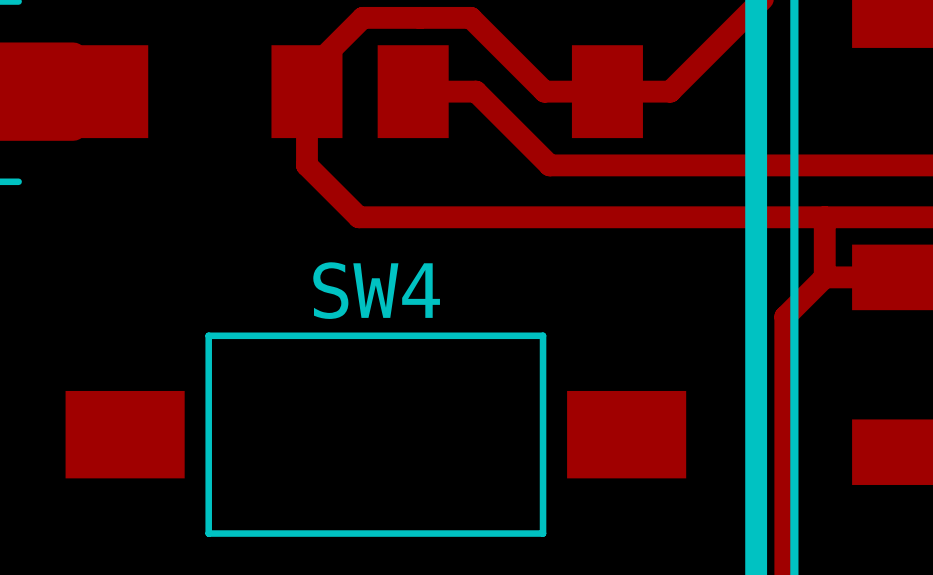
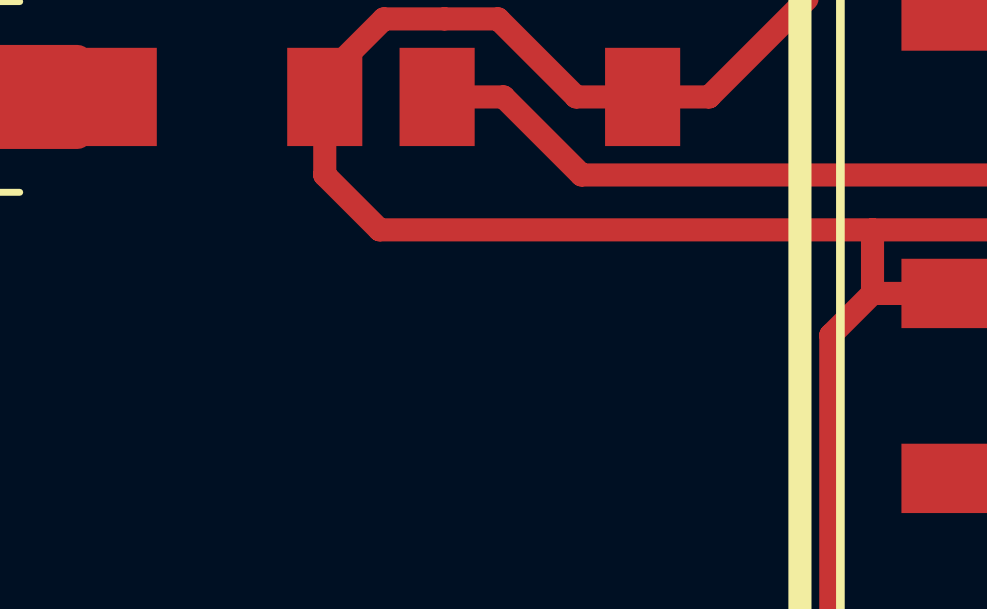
SW4: (375, 434) -> none

